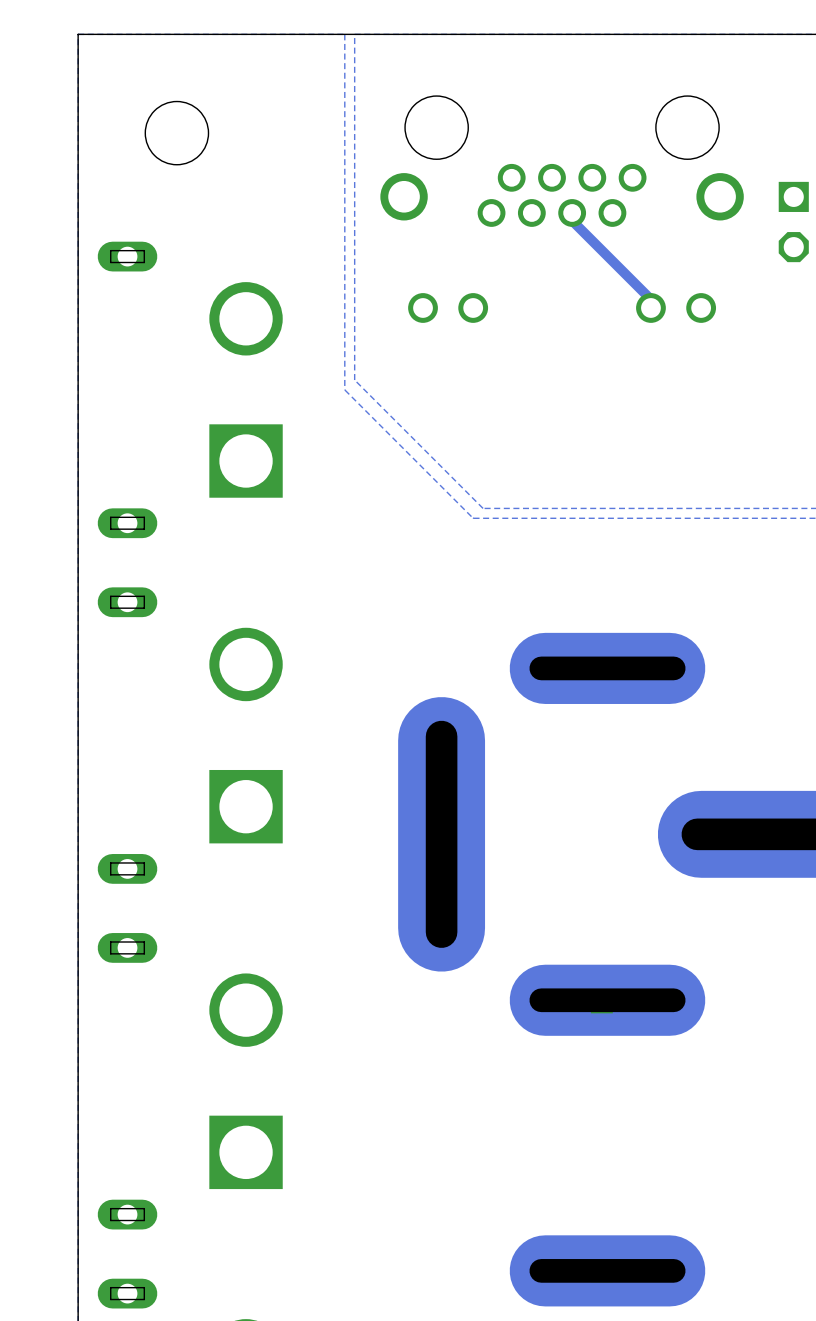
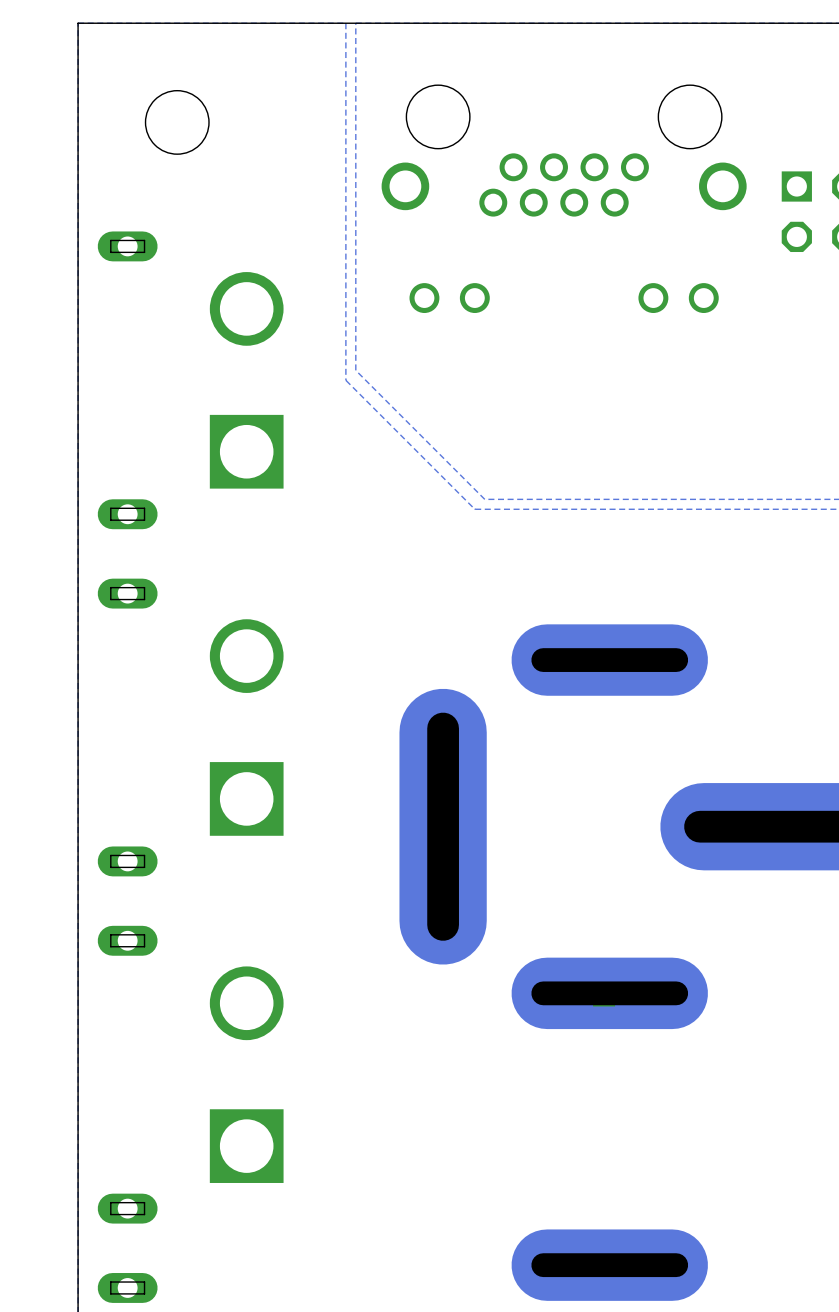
track: (572, 212) (573, 221) (649, 298) (650, 307) -> none

